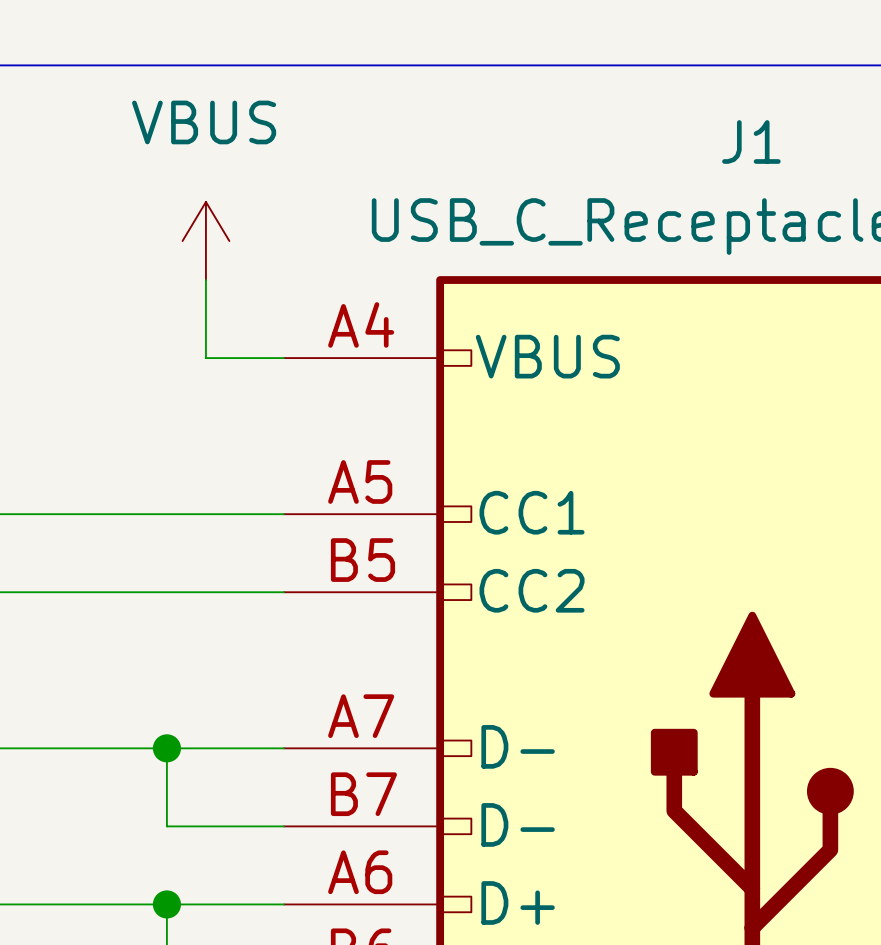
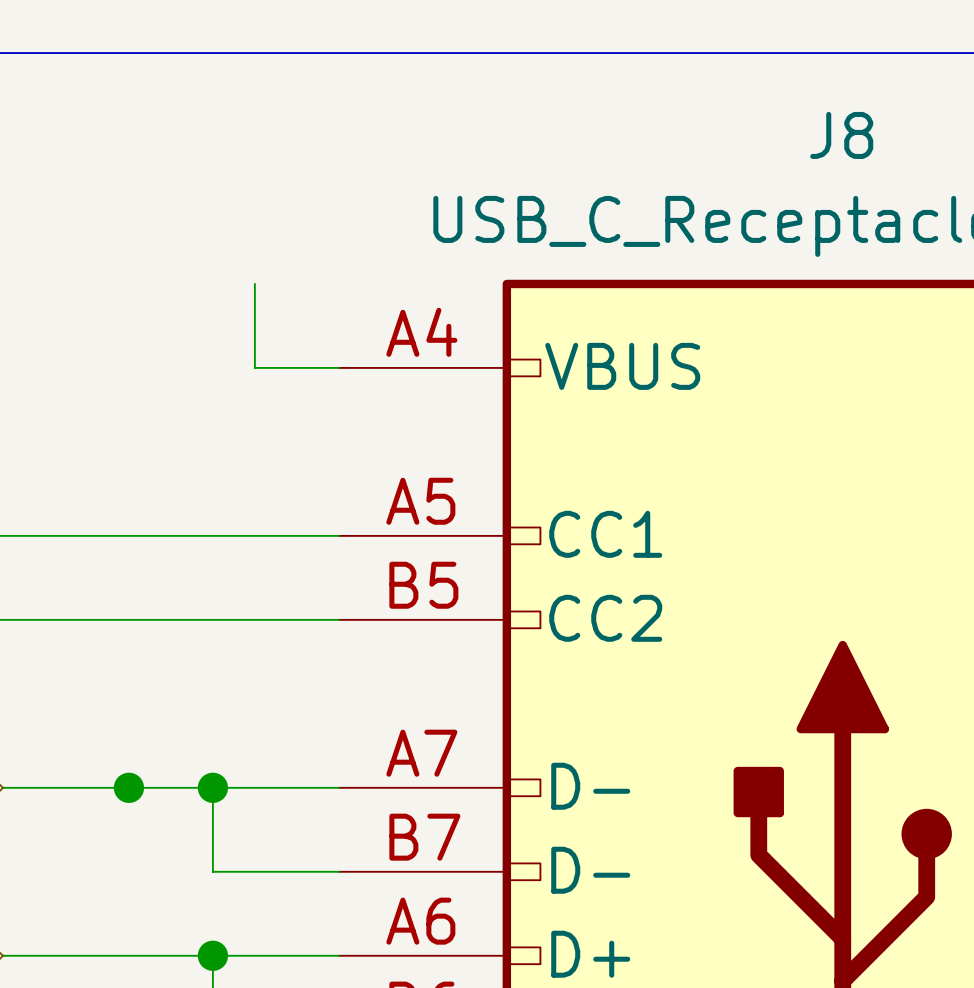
J1 name: J1 (751, 141) -> J8 (841, 135)
power symbol: VBUS (205, 241) -> none
junction: none -> (128, 787)

